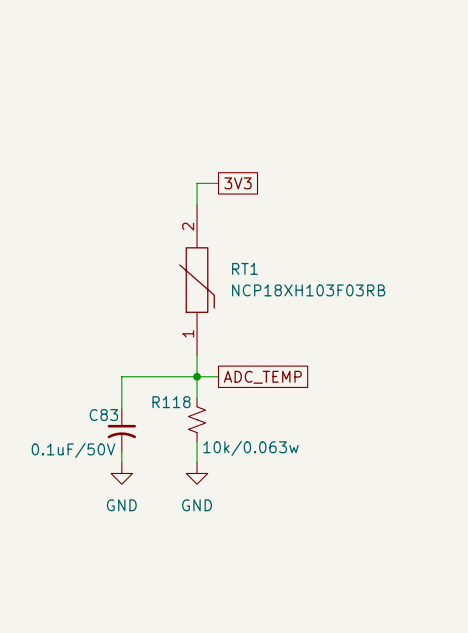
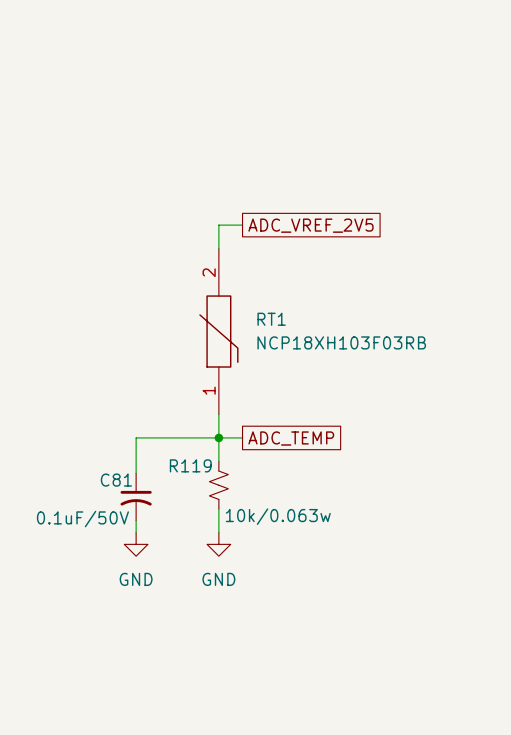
global label: 3V3 (237, 183) -> ADC_VREF_2V5 (310, 225)
R118 name: R118 (171, 402) -> R119 (190, 465)
C83 name: C83 (103, 415) -> C81 (116, 480)

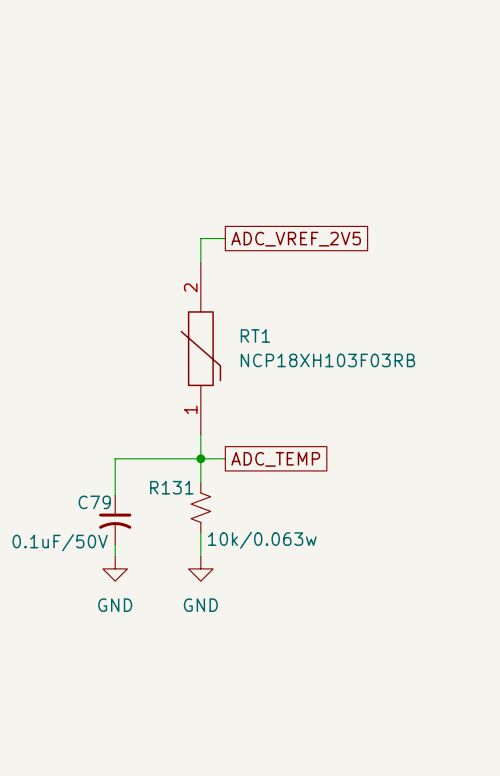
R119 name: R119 (190, 465) -> R131 (171, 487)
C81 name: C81 (116, 480) -> C79 (94, 502)

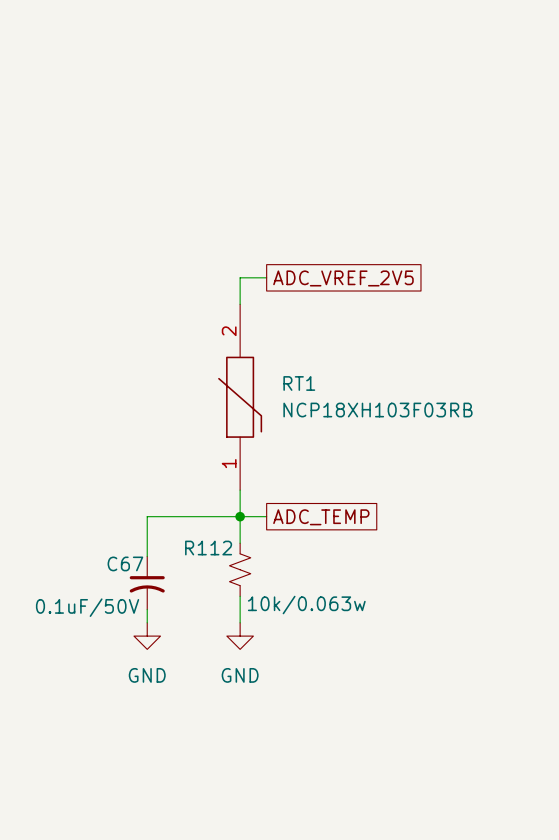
R131 name: R131 (171, 487) -> R112 (208, 548)
C79 name: C79 (94, 502) -> C67 (125, 563)

